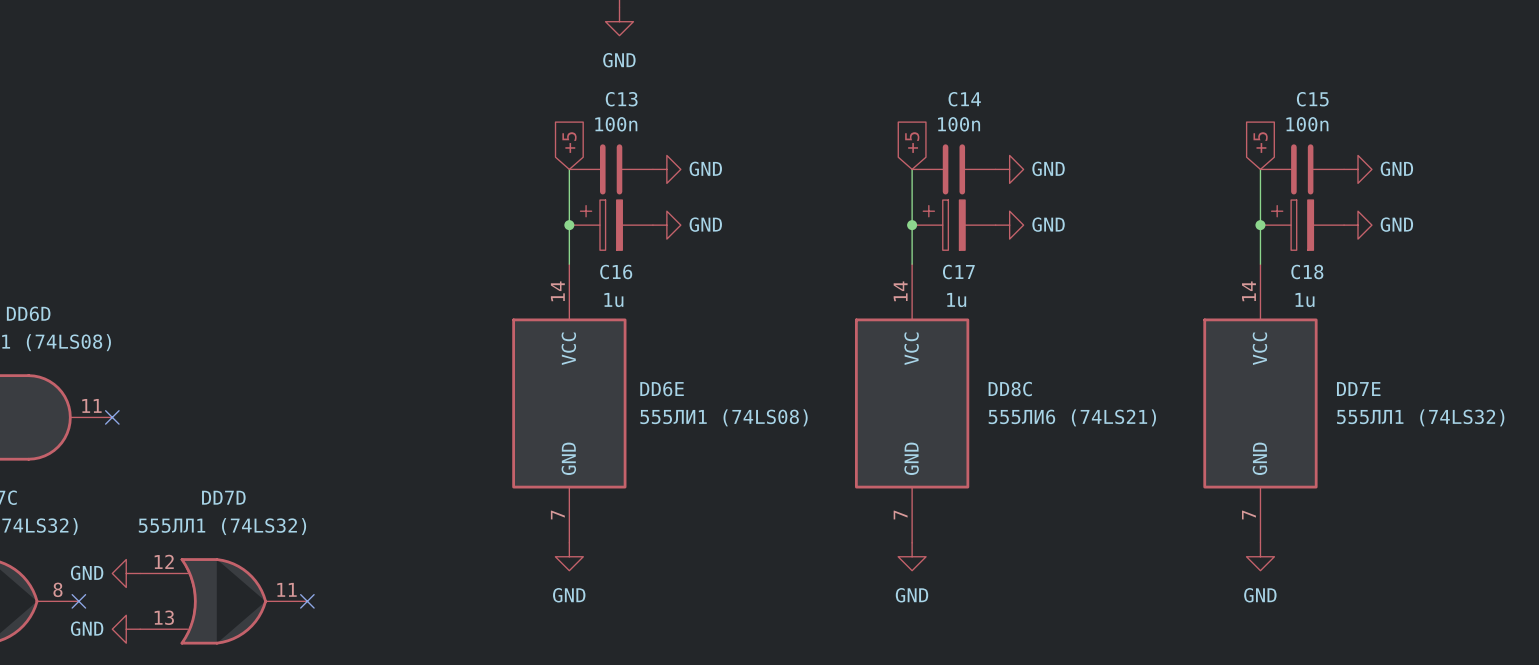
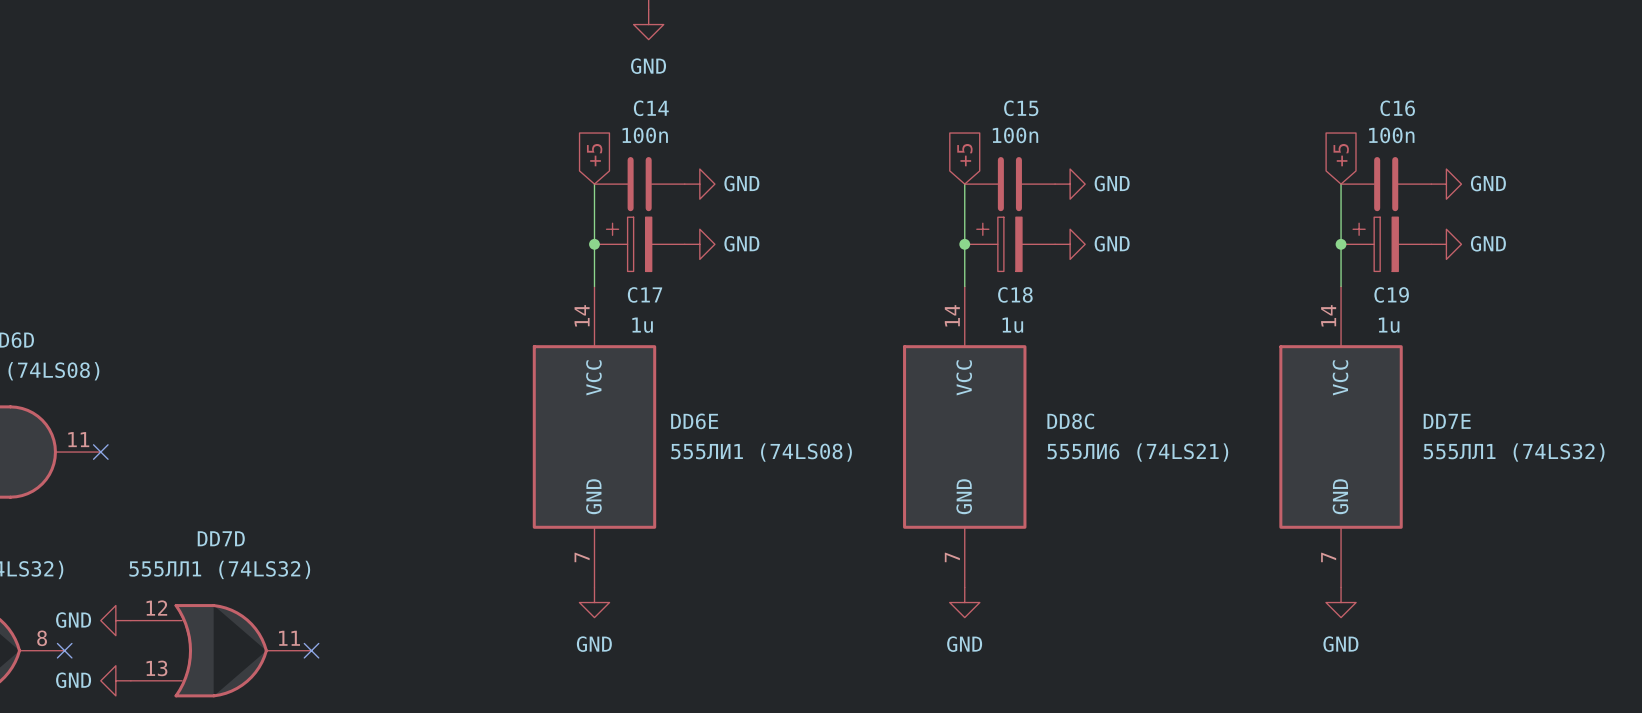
C13 name: C13 (621, 99) -> C14 (651, 108)
C14 name: C14 (964, 99) -> C15 (1021, 108)
C15 name: C15 (1312, 99) -> C16 (1397, 108)
C16 name: C16 (616, 272) -> C17 (645, 294)
C17 name: C17 (958, 272) -> C18 (1015, 294)
C18 name: C18 (1307, 272) -> C19 (1391, 294)

